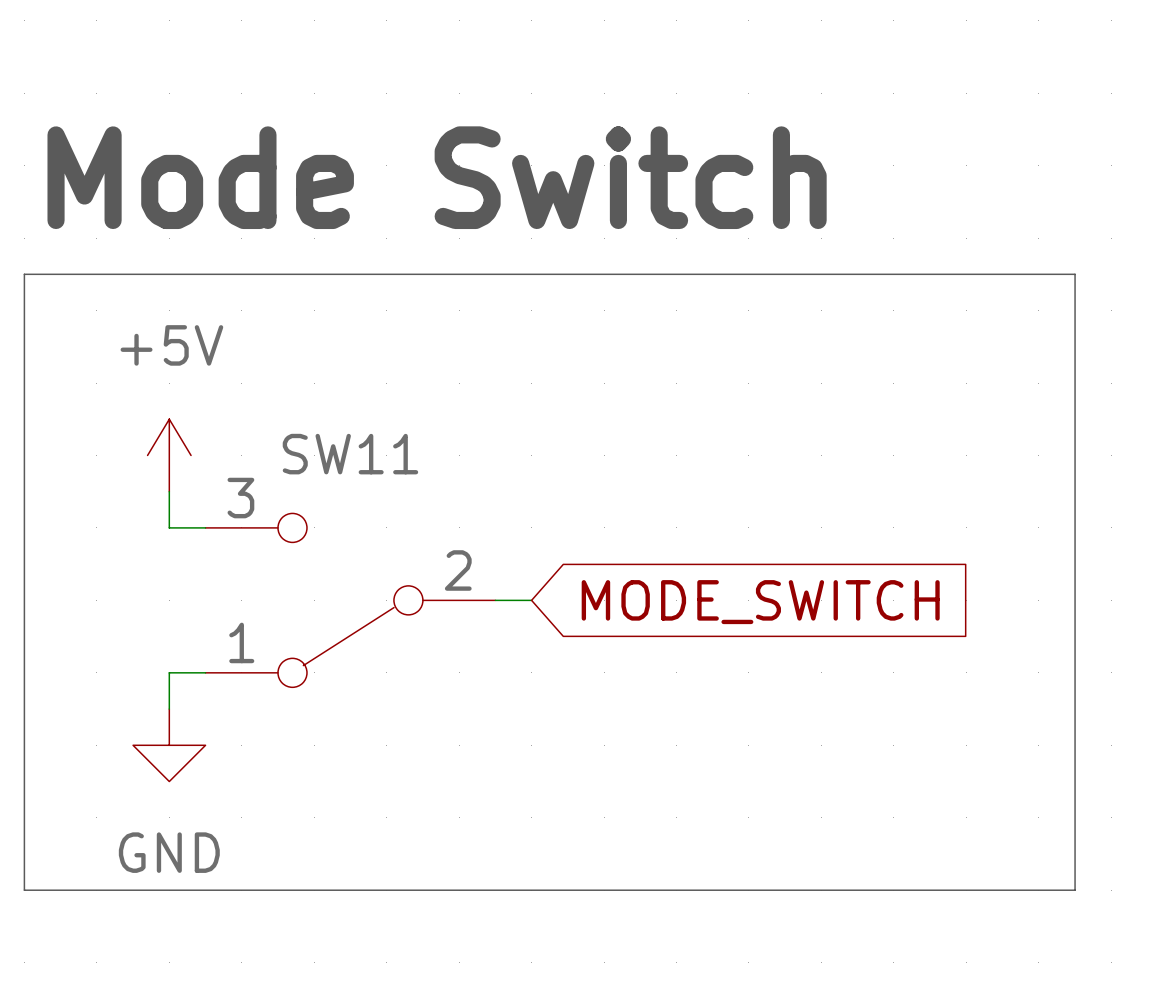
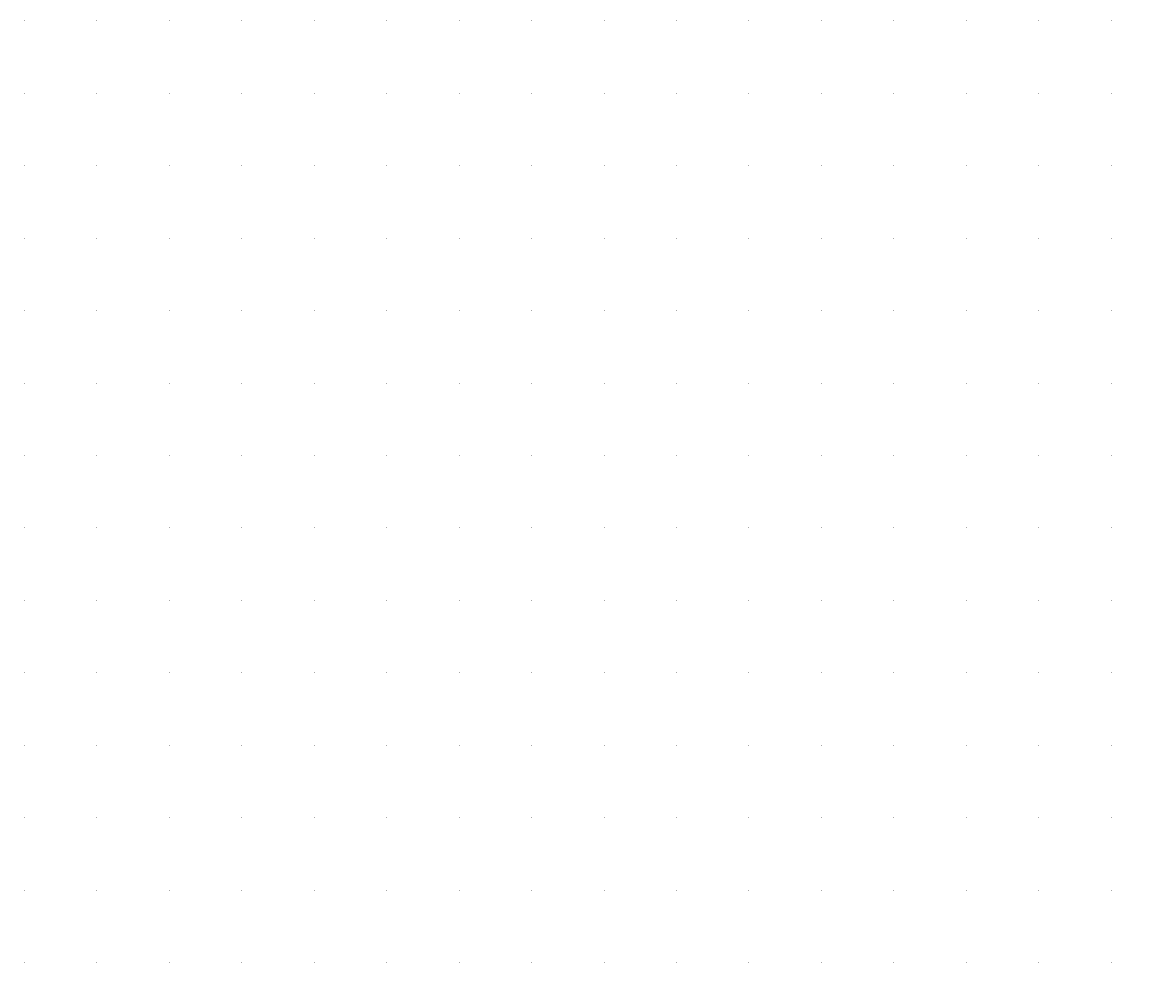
text: Mode Switch (437, 177) -> none
line: (24, 274) (1075, 274) (1075, 890) (24, 890) (24, 274) -> none
power symbol: +5V (169, 455) -> none
wire: (169, 491) (169, 527) (205, 527) -> none
SW11: (350, 600) -> none
wire: (495, 600) (531, 600) -> none
global label: MODE_SWITCH (760, 602) -> none
wire: (205, 672) (169, 672) (169, 709) -> none
power symbol: GND (169, 745) -> none

